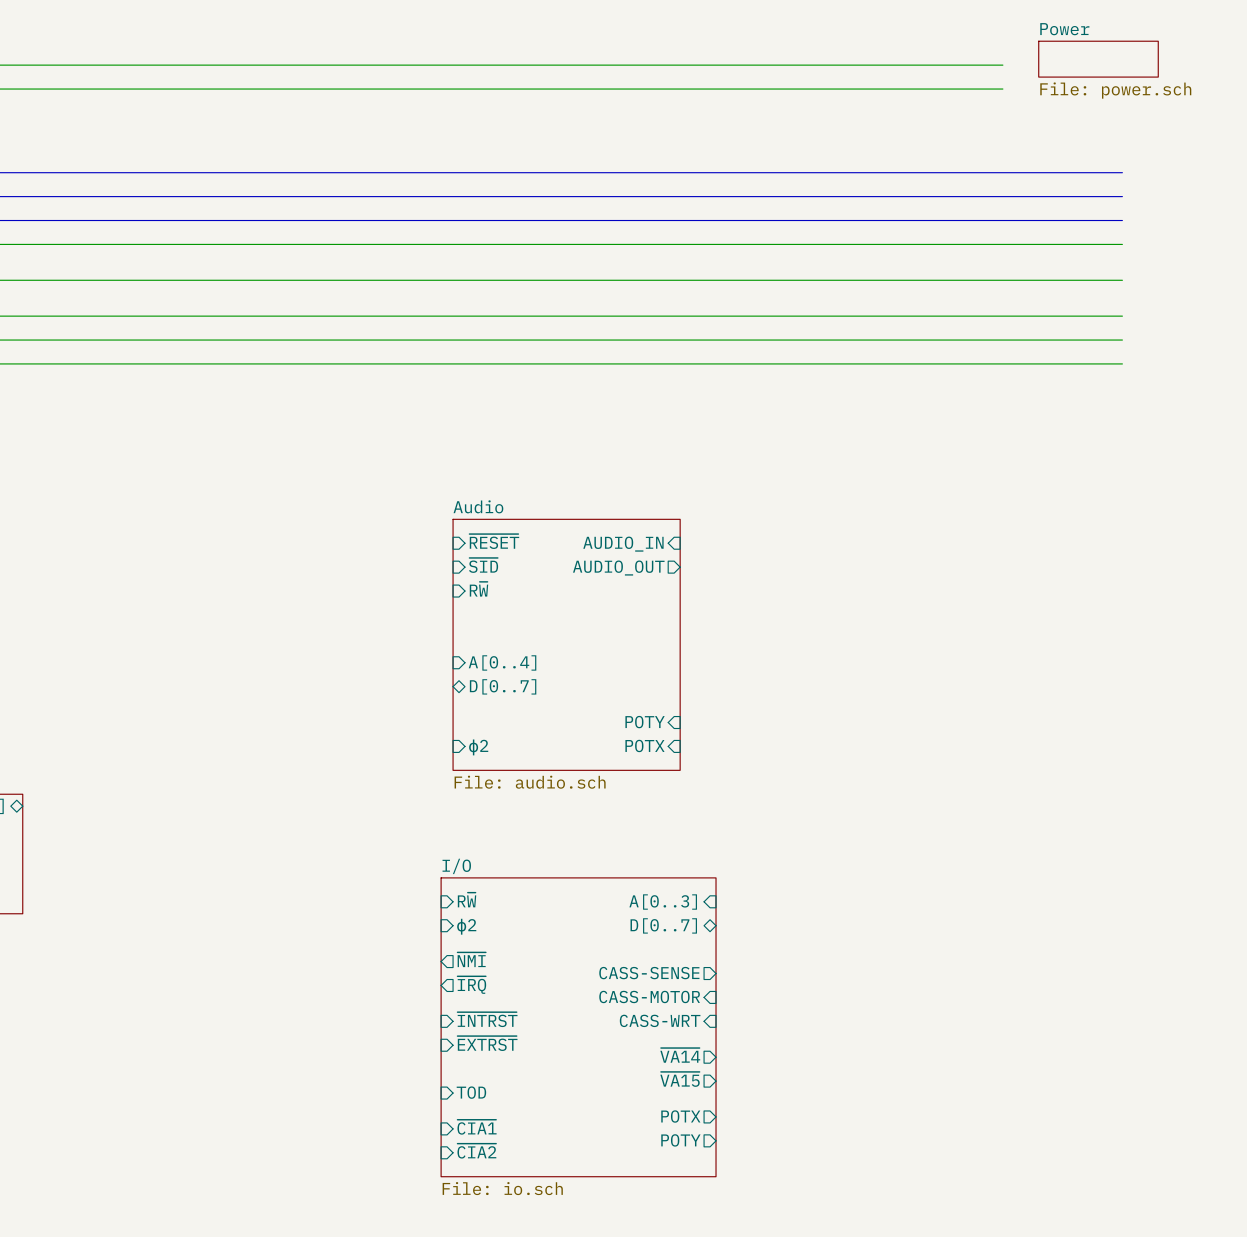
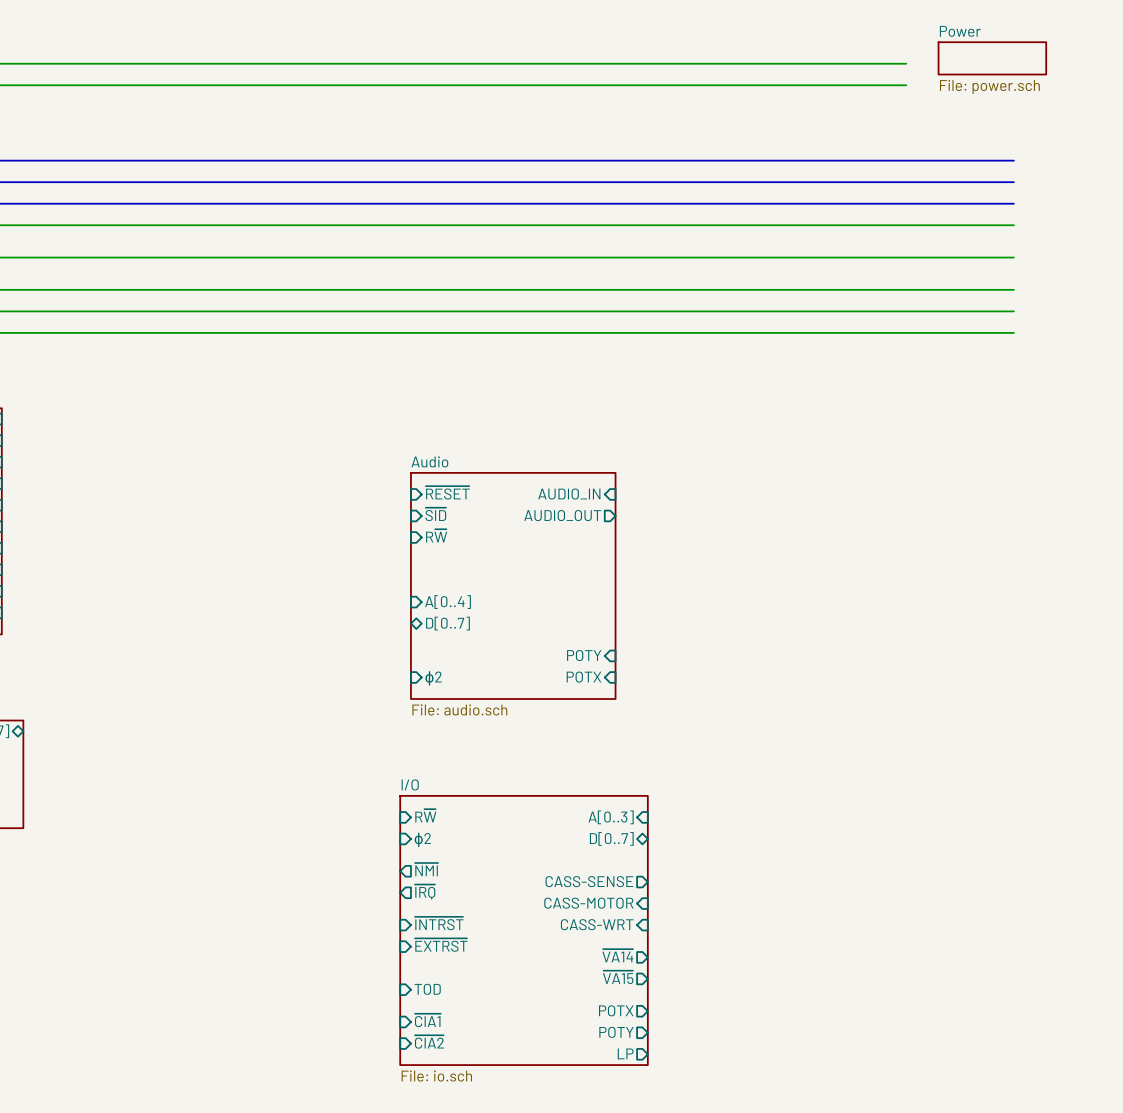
sheet pin: none -> LP (625, 1053)

